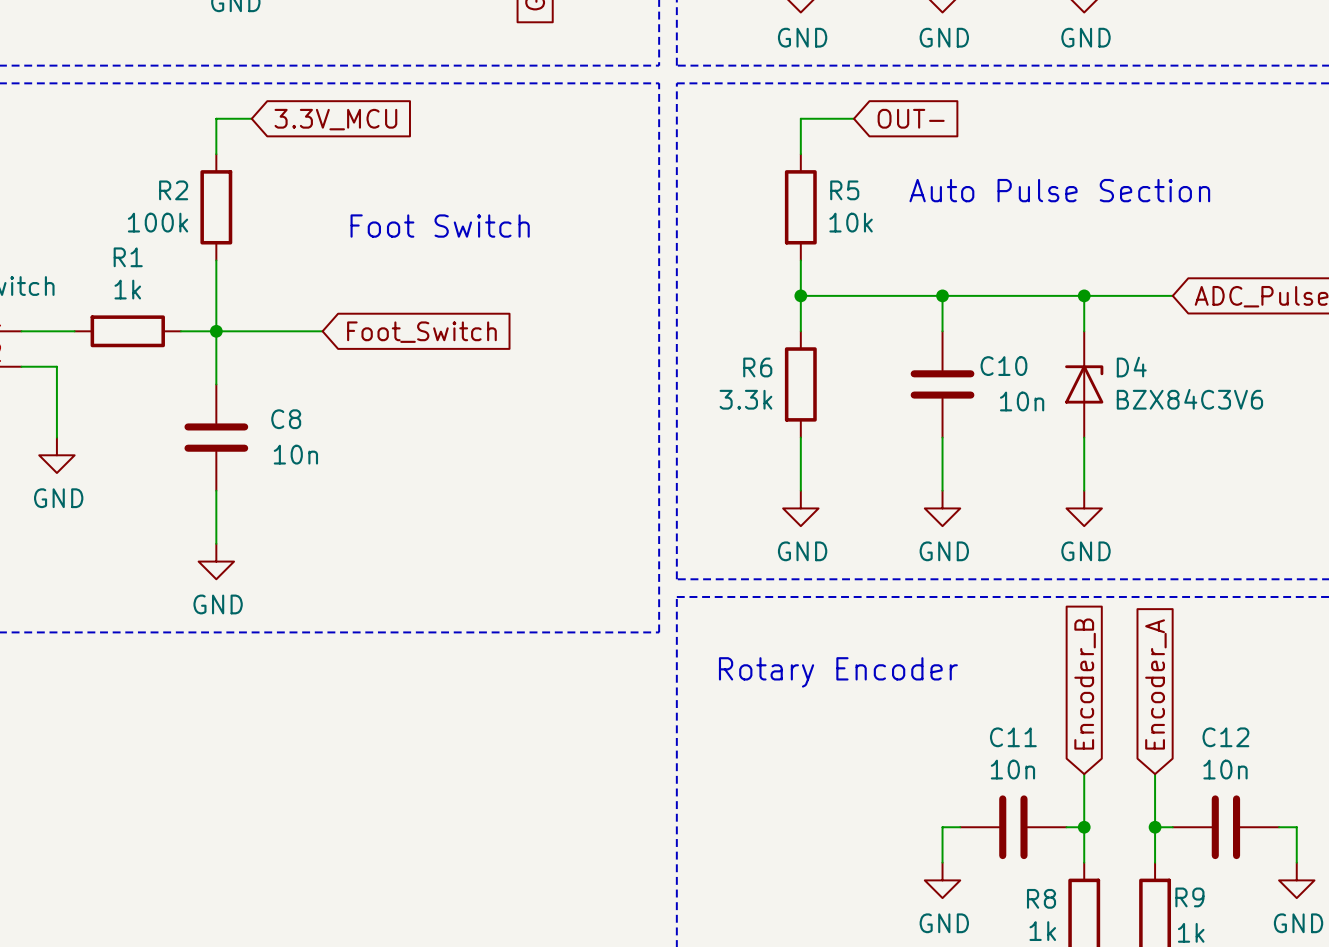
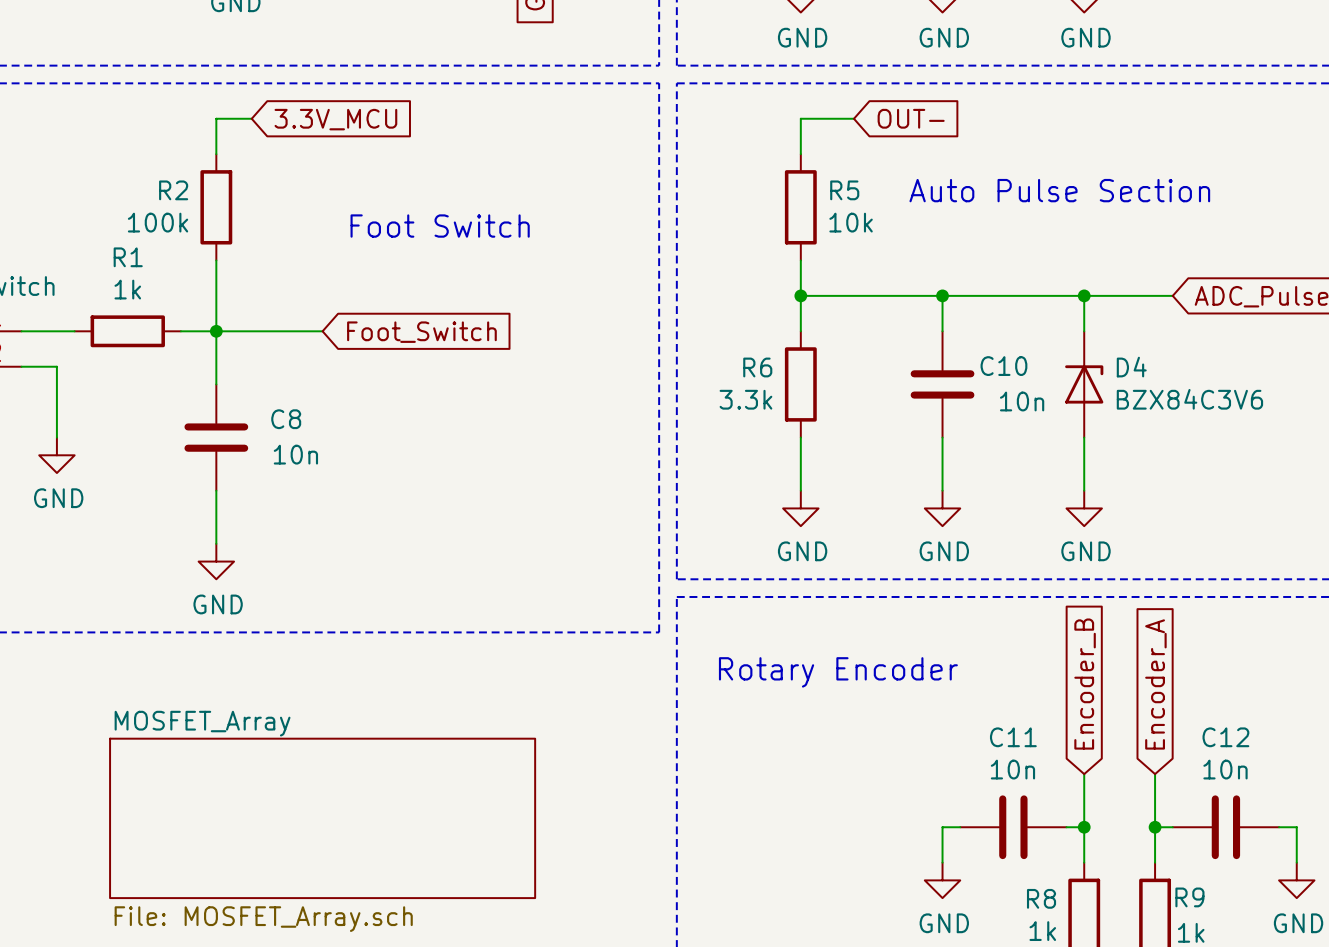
sheet MOSFET_Array: none -> File: MOSFET_Array.sch (322, 818)

